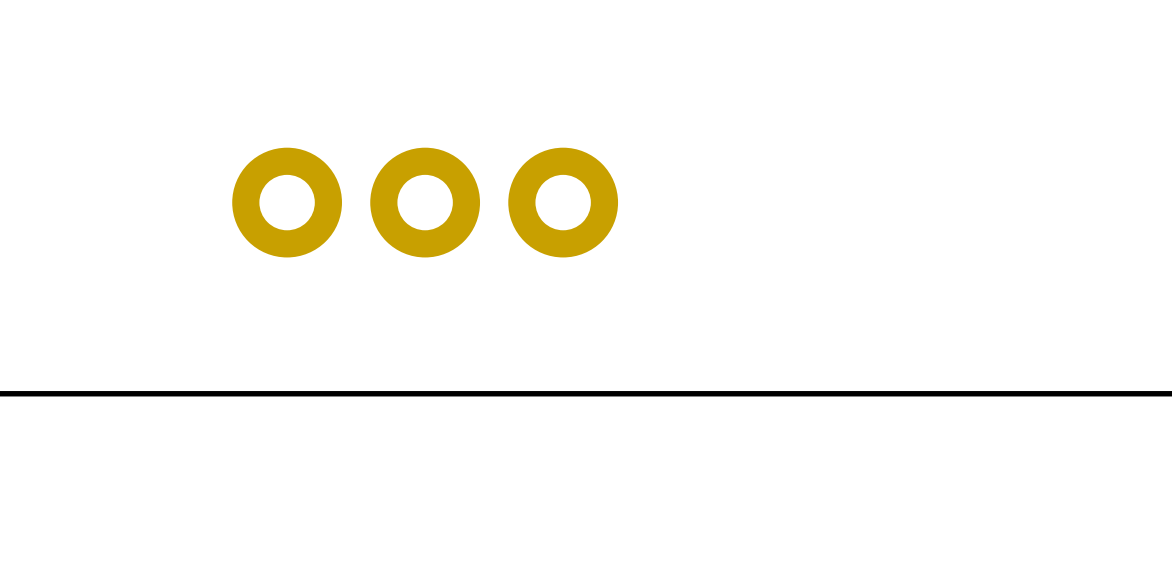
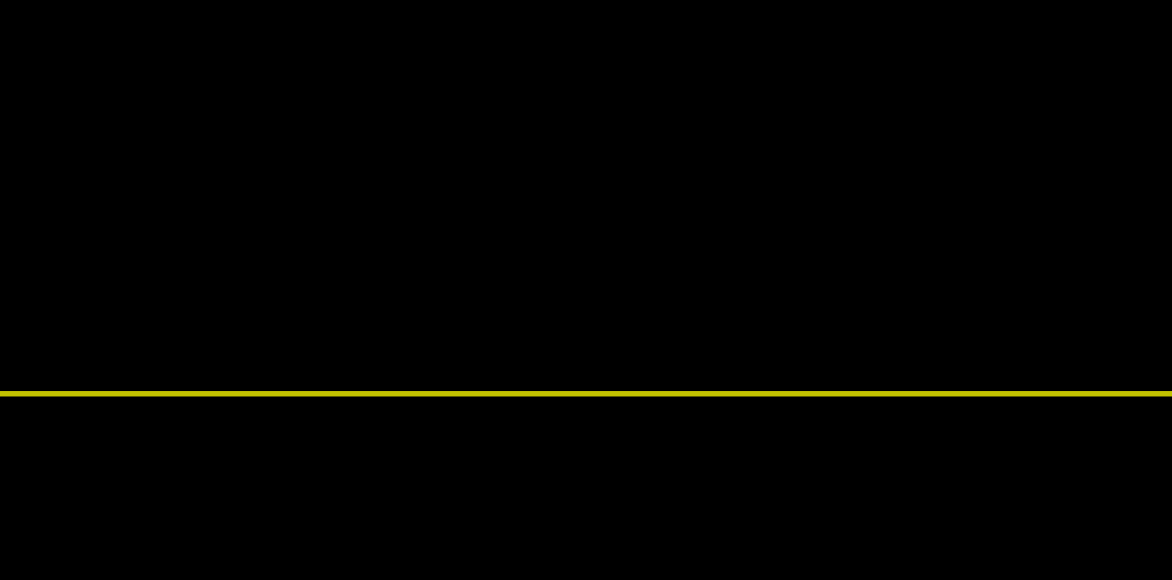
part: (425, 202) -> none

